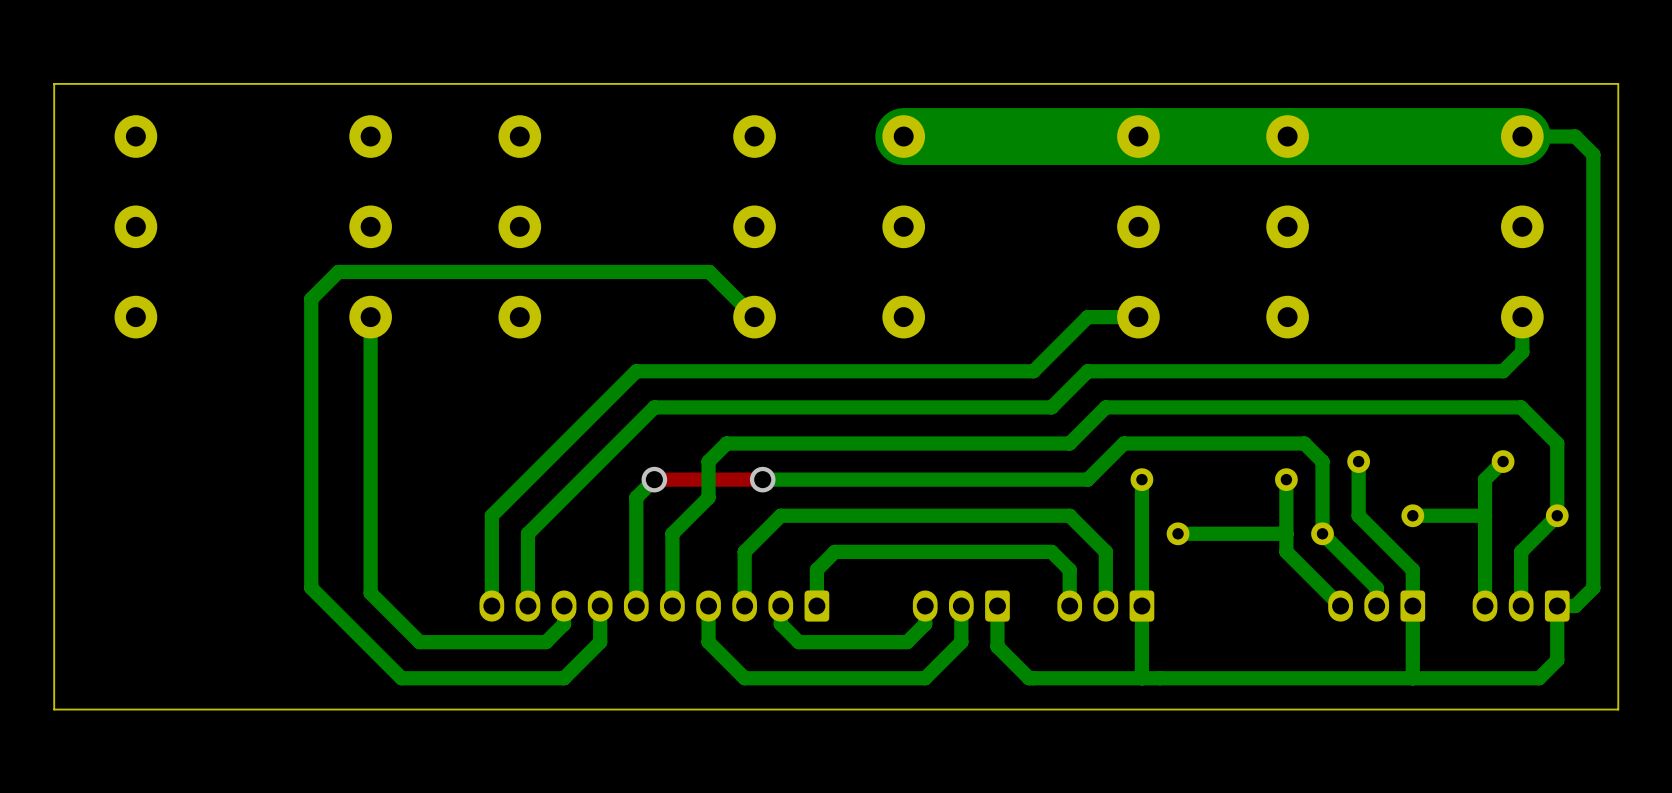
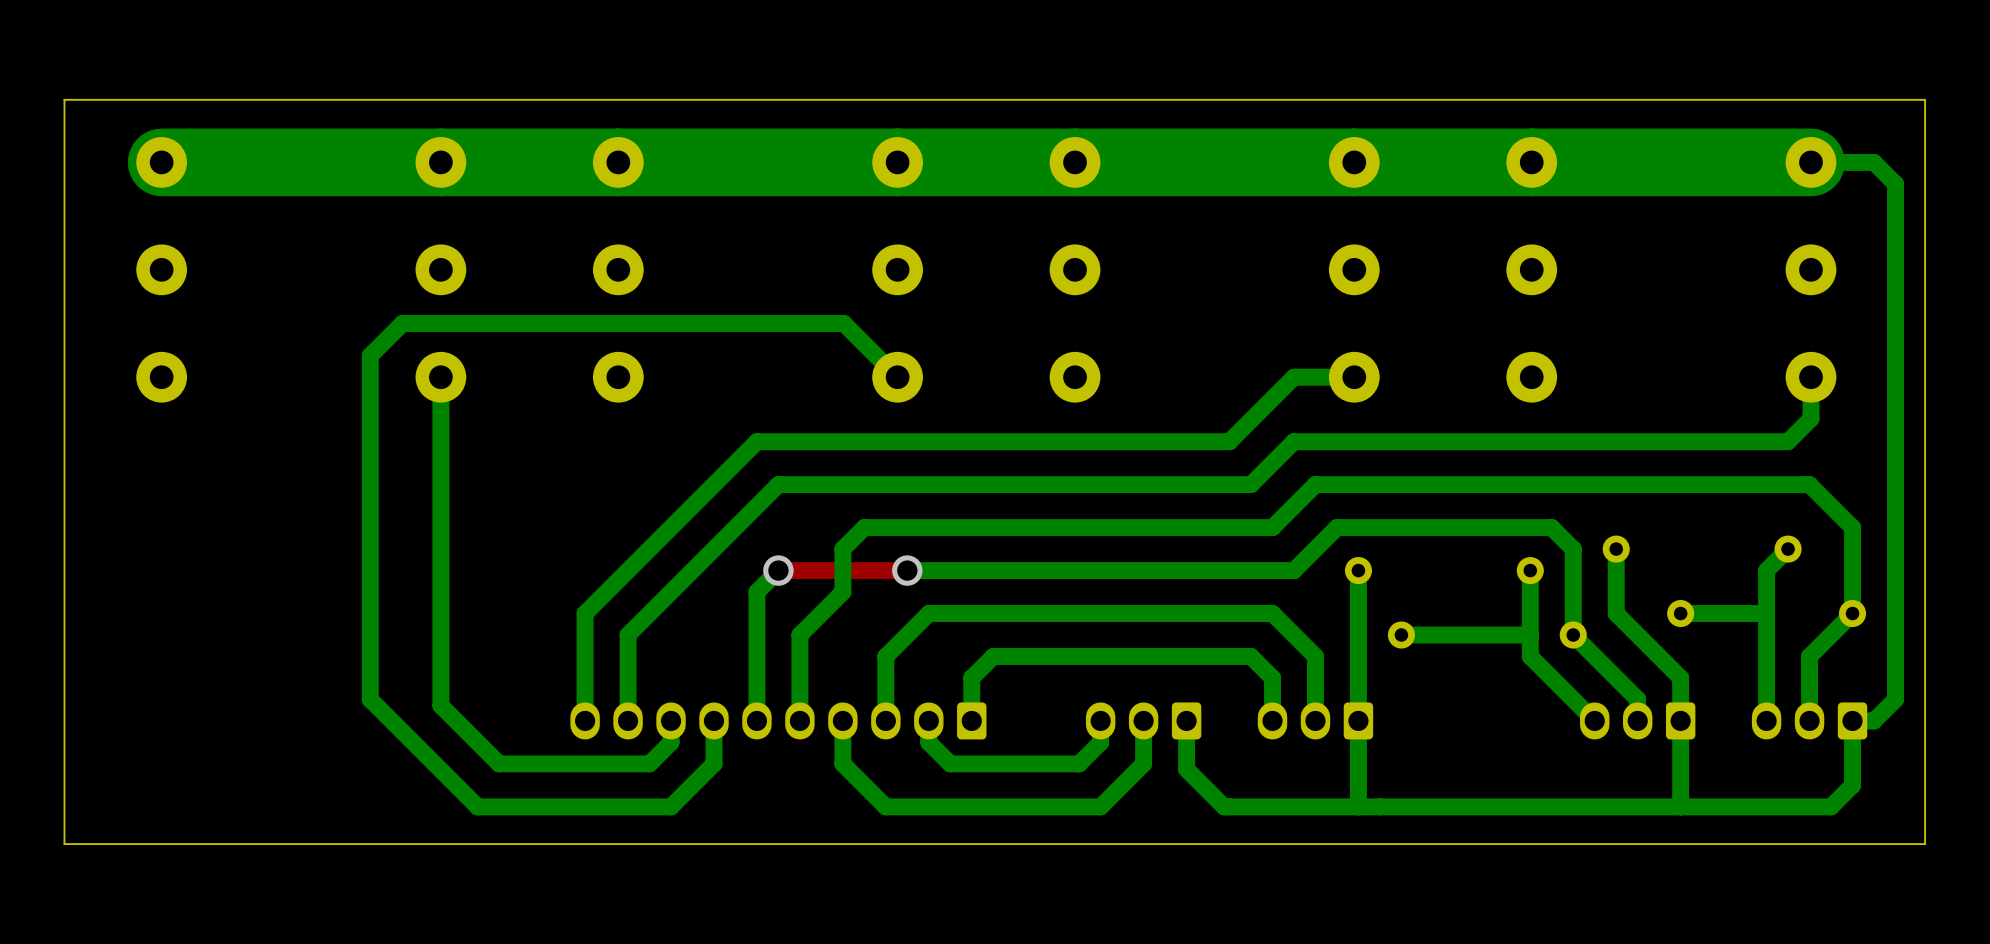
bottom track: none -> (1075, 162) (161, 162)

